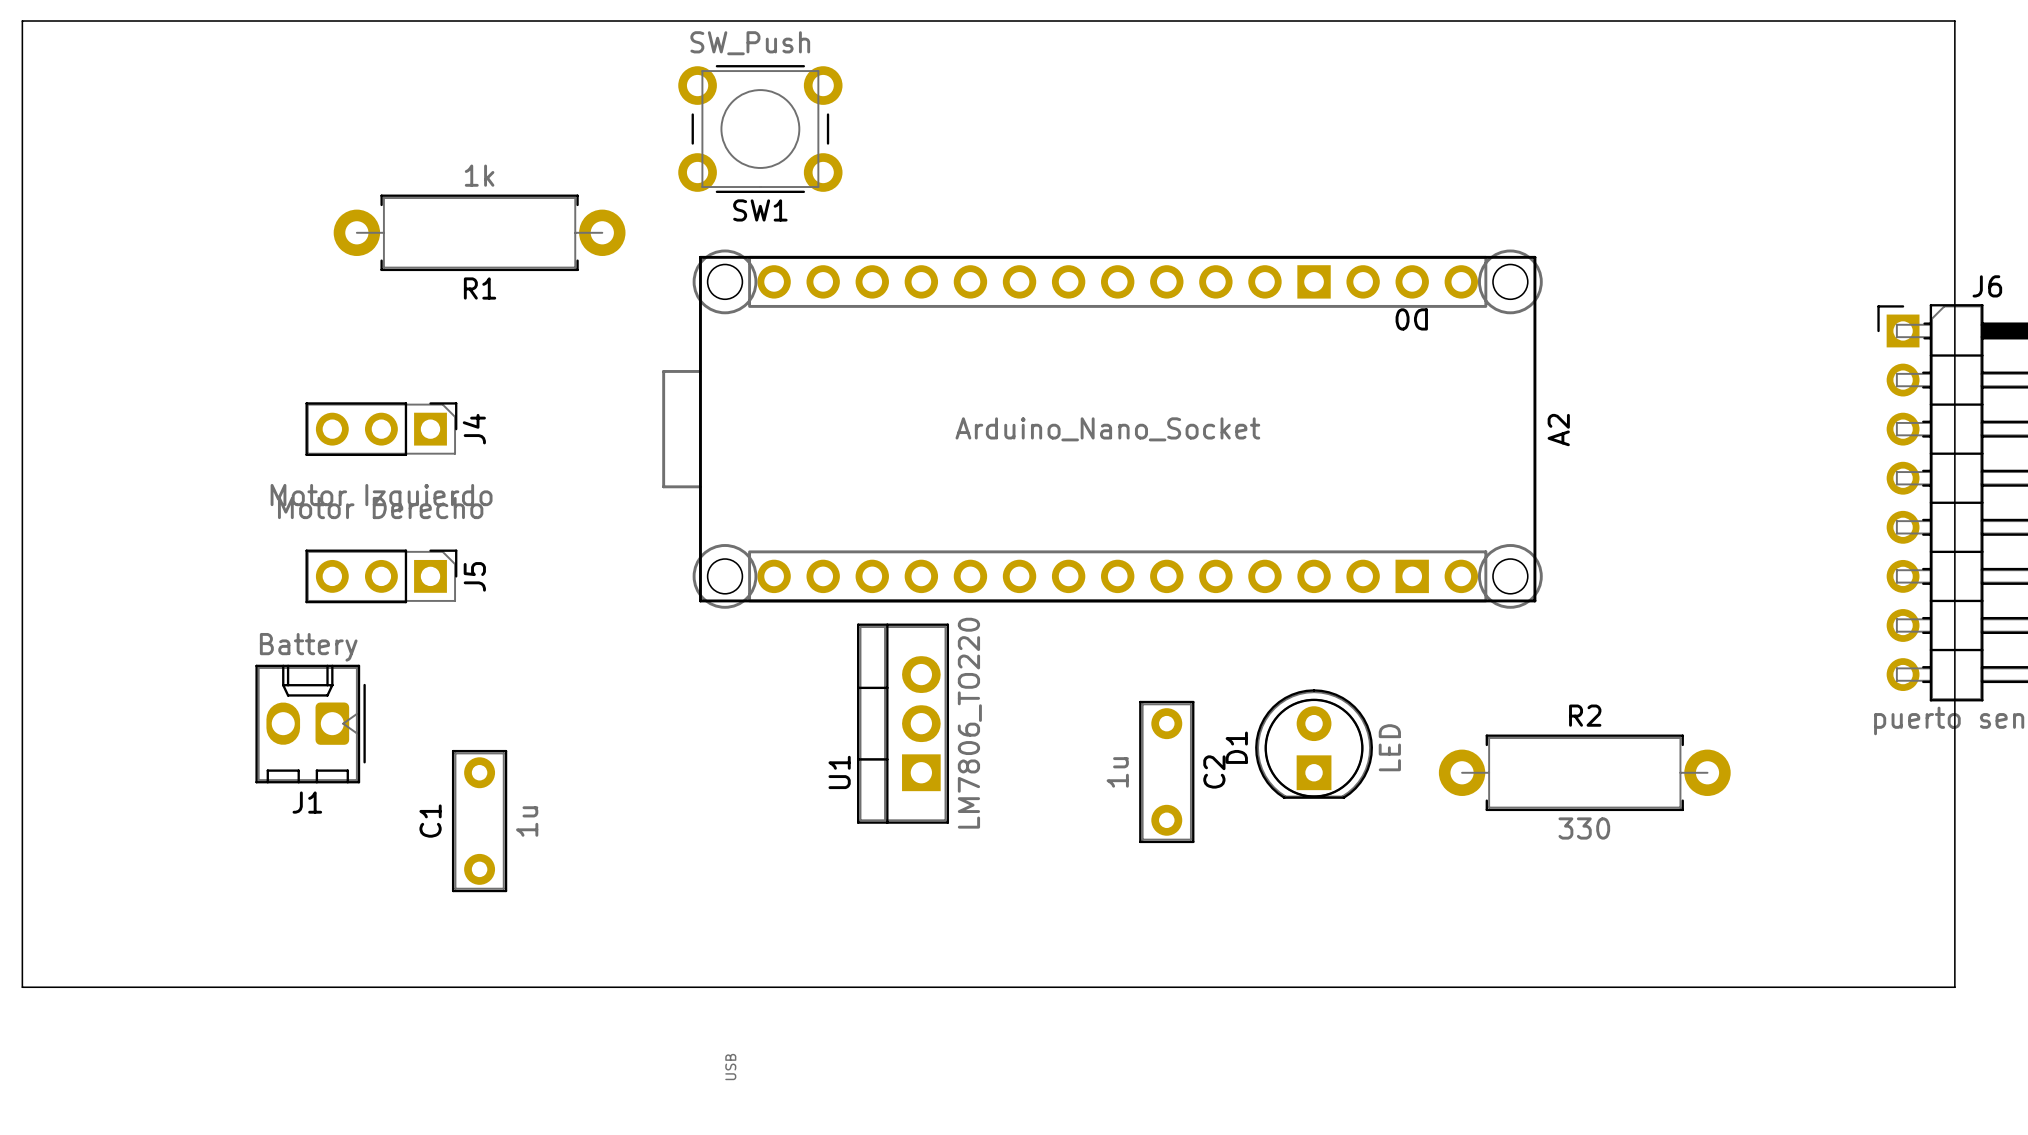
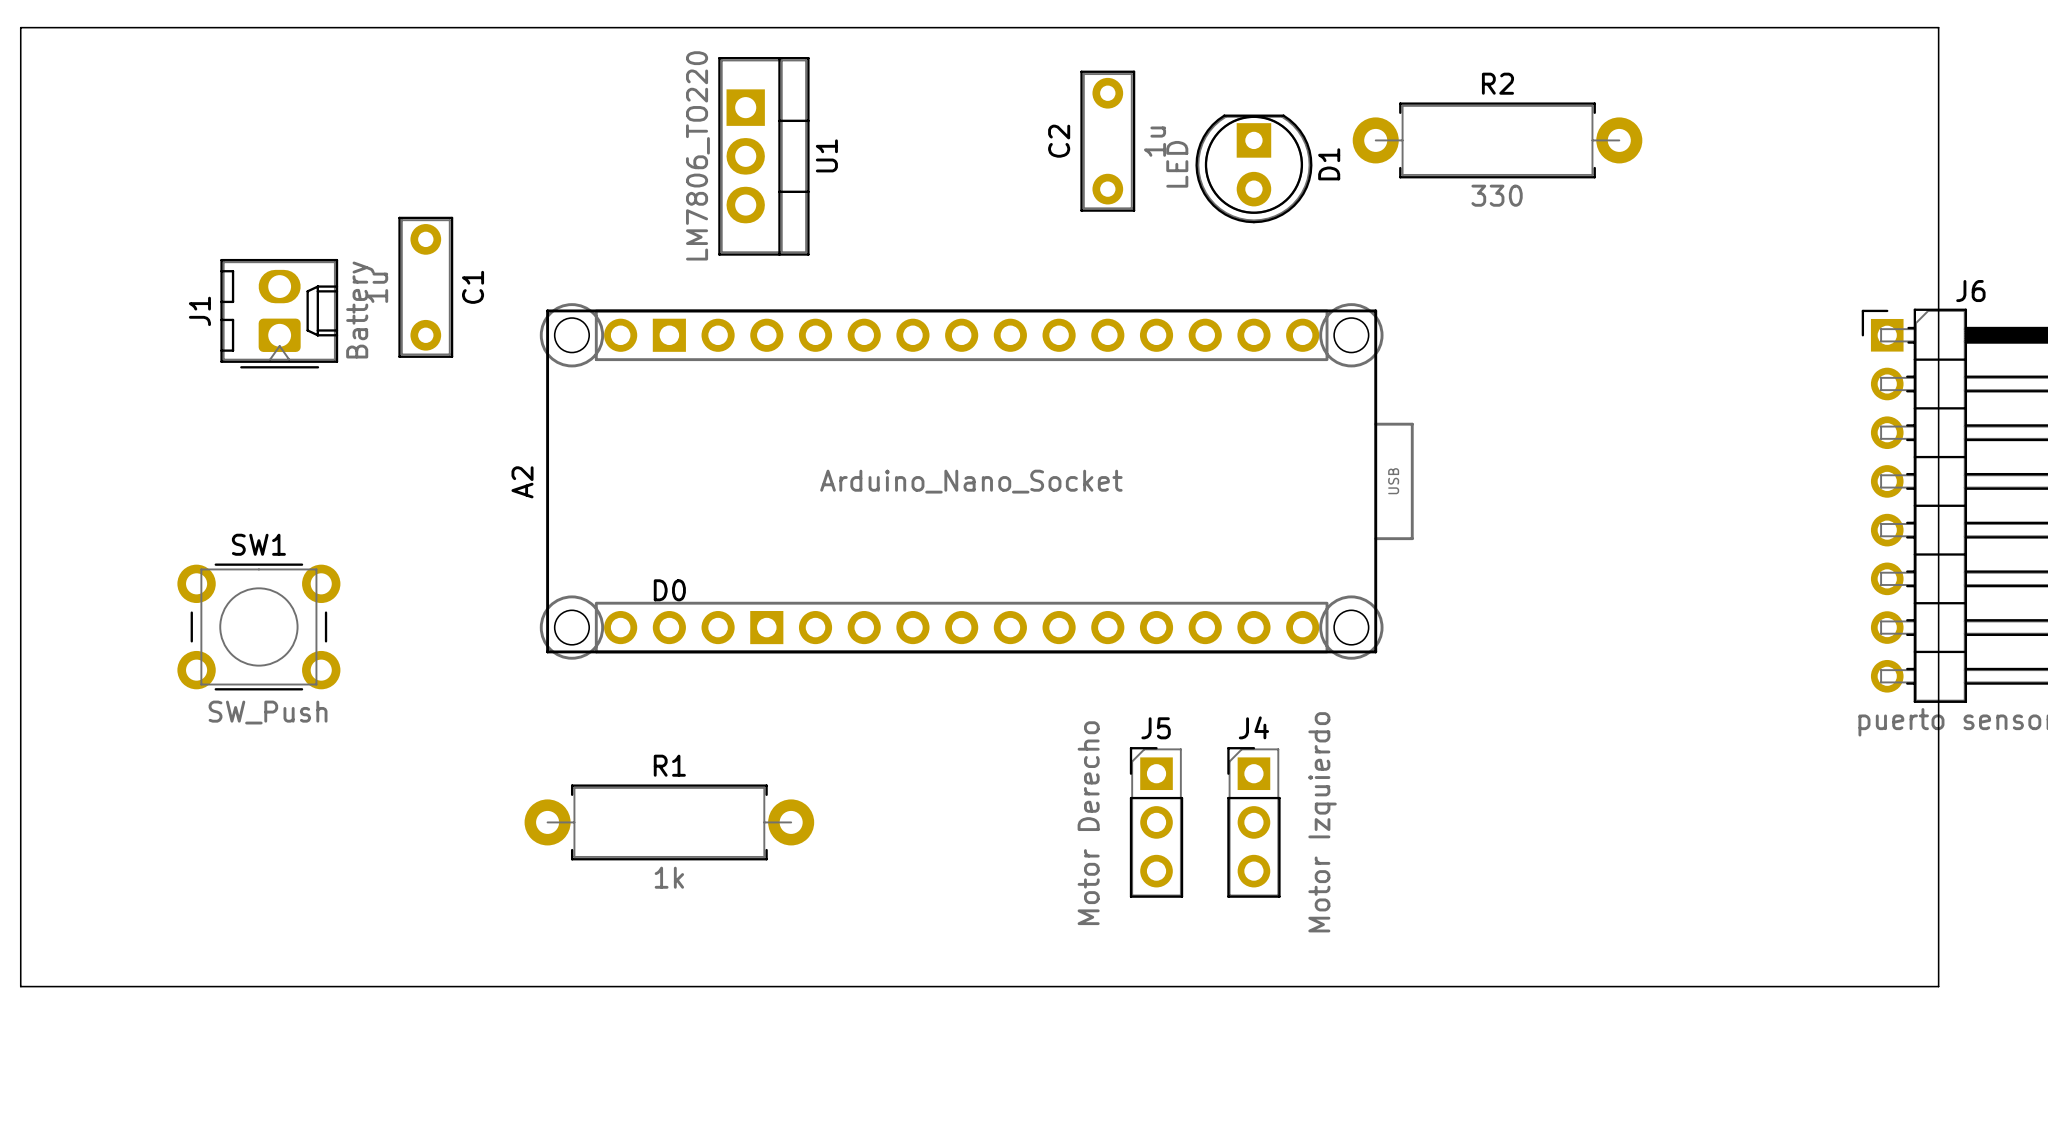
SW1 rotation: 0° (760, 129) -> 180° (258, 626)
SW1 position: (760, 129) -> (258, 626)
R1 value position: 1k (479, 175) -> 1k (669, 877)
R1 position: (479, 232) -> (669, 822)
A2 footprint: [662, 249, 1543, 609] -> [539, 303, 1414, 660]
R1 name position: R1 (480, 288) -> R1 (669, 765)
J4 rotation: 0° (381, 429) -> 90° counterclockwise (1253, 822)
J4 position: (381, 429) -> (1253, 822)
A2 name position: A2 (1558, 430) -> A2 (522, 482)
J5 rotation: 0° (381, 576) -> 90° counterclockwise (1156, 822)
J5 position: (381, 576) -> (1156, 822)
U1 rotation: 0° (903, 723) -> 180° (763, 156)
U1 position: (903, 723) -> (763, 156)
J1 rotation: 0° (310, 724) -> 90° clockwise (279, 313)
J1 position: (310, 724) -> (279, 313)
D1 rotation: 0° (1314, 744) -> 180° (1253, 168)
D1 position: (1314, 744) -> (1253, 168)
C2 position: (1166, 771) -> (1107, 141)
C2 name position: C2 (1214, 771) -> C2 (1059, 141)
U1 name position: U1 (839, 772) -> U1 (826, 155)
C2 value position: 1u (1117, 772) -> 1u (1155, 141)
R2 position: (1584, 772) -> (1497, 140)
C1 name position: C1 (430, 821) -> C1 (473, 287)
C1 position: (479, 821) -> (425, 287)
C1 value position: 1u (527, 821) -> 1u (377, 287)

